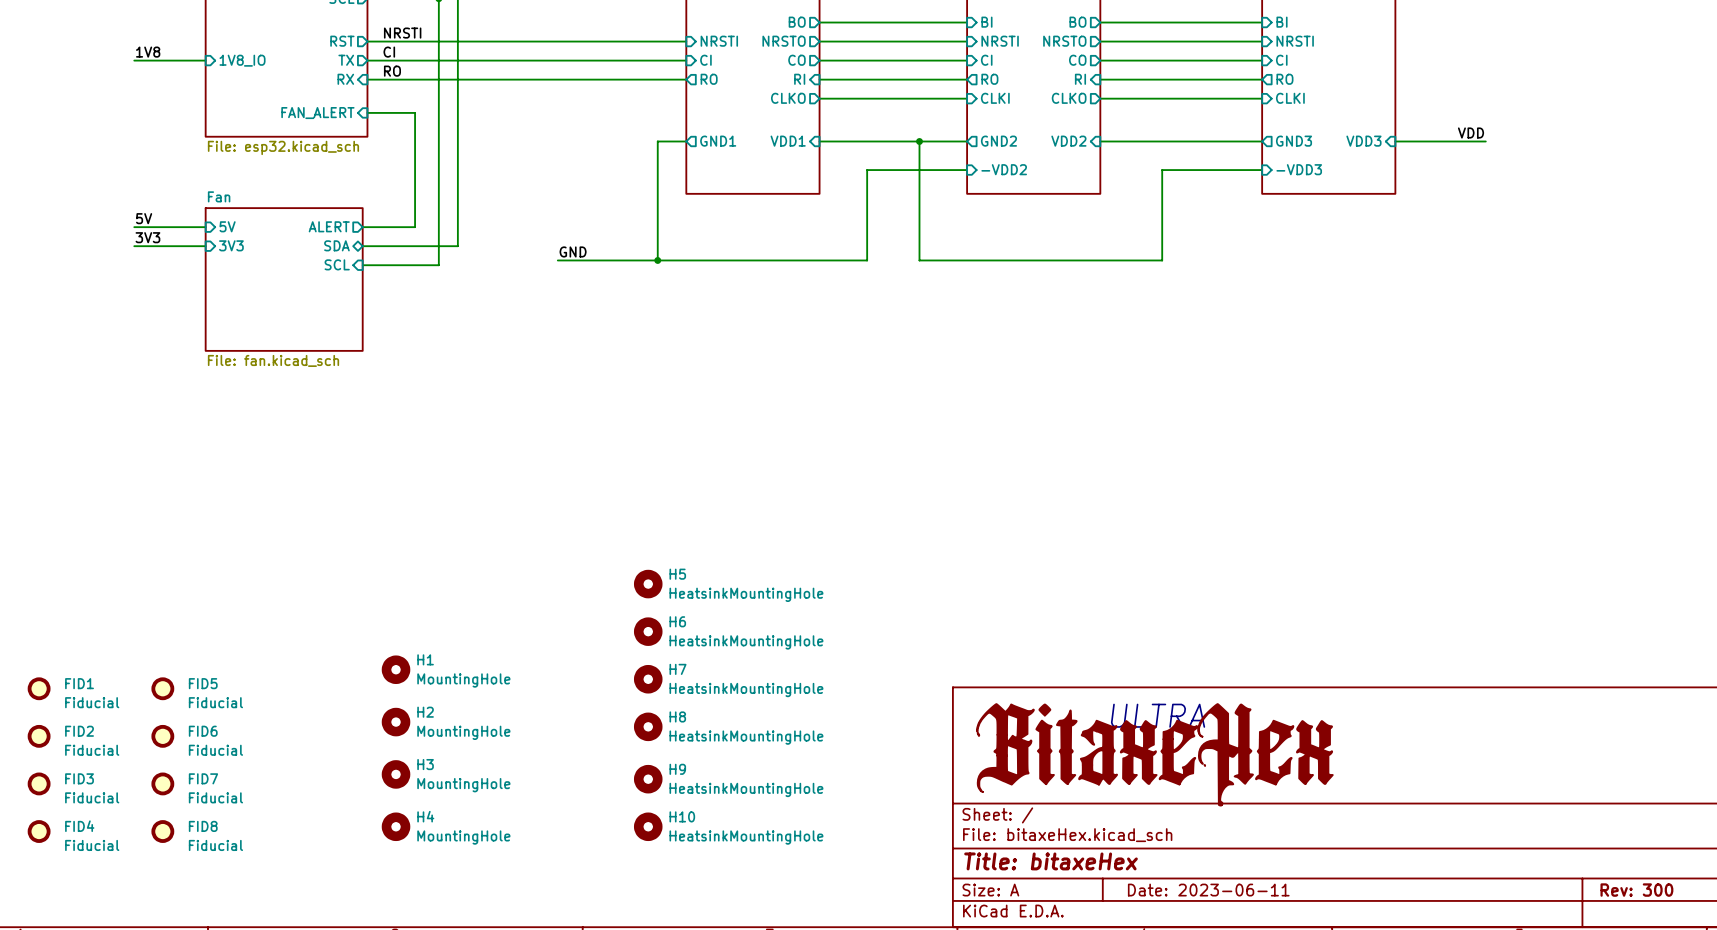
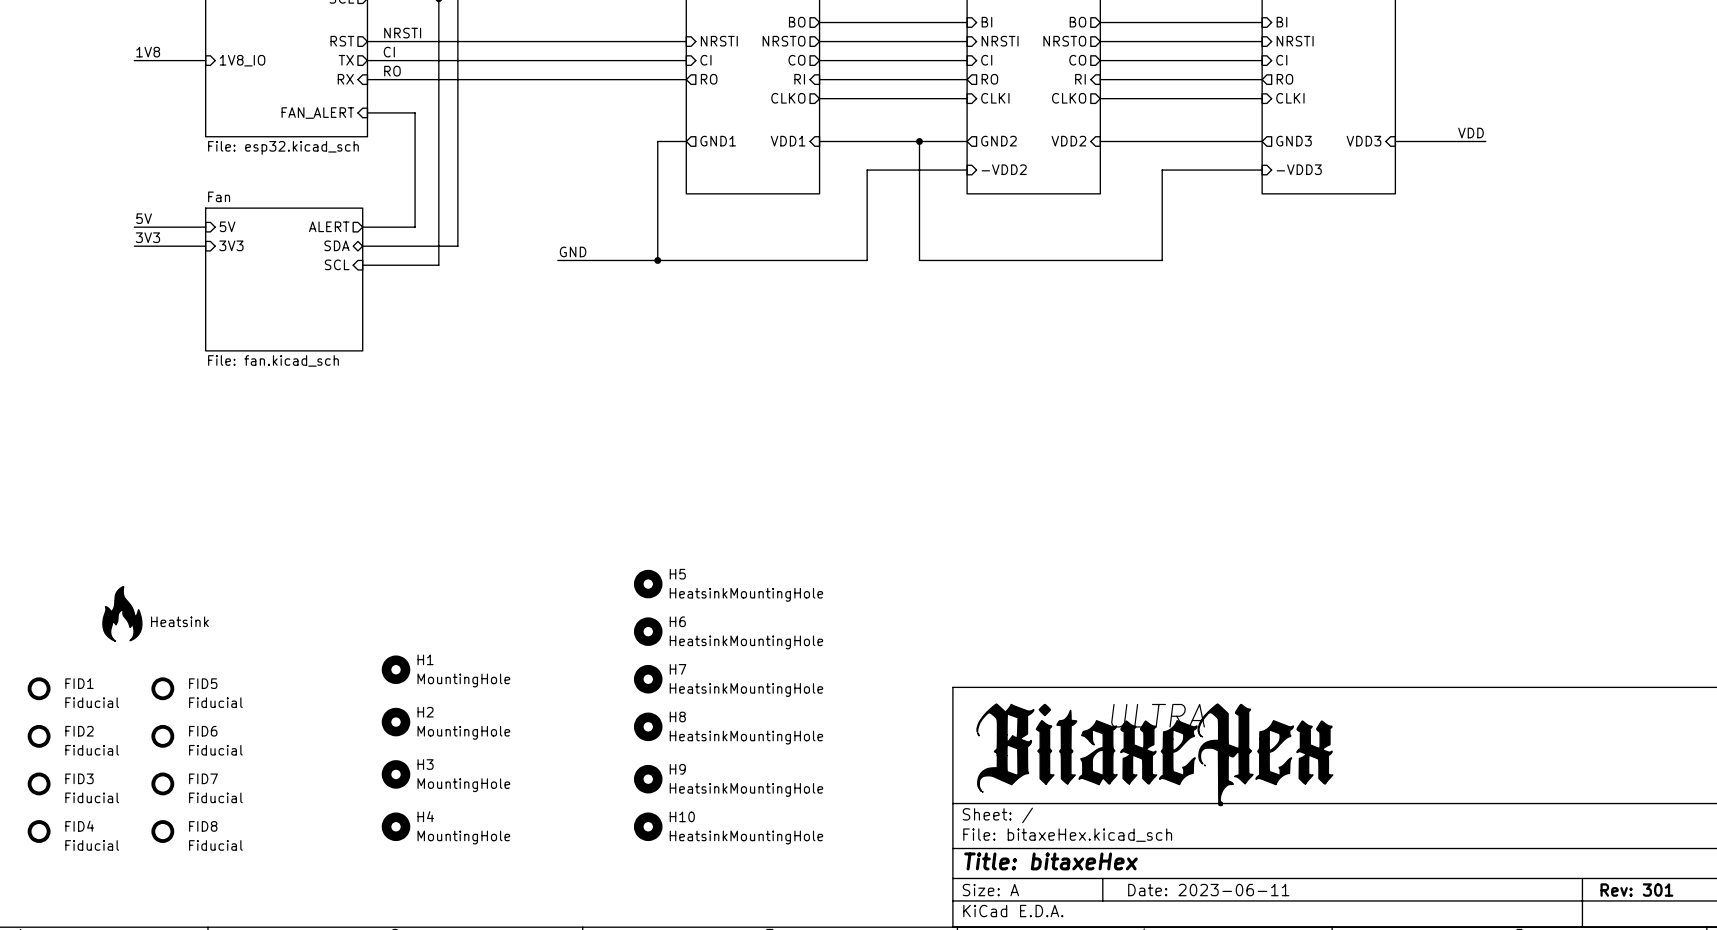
part: none -> Heatsink (122, 613)
title block: Rev: 300 (1636, 890) -> Rev: 301 (1636, 890)

